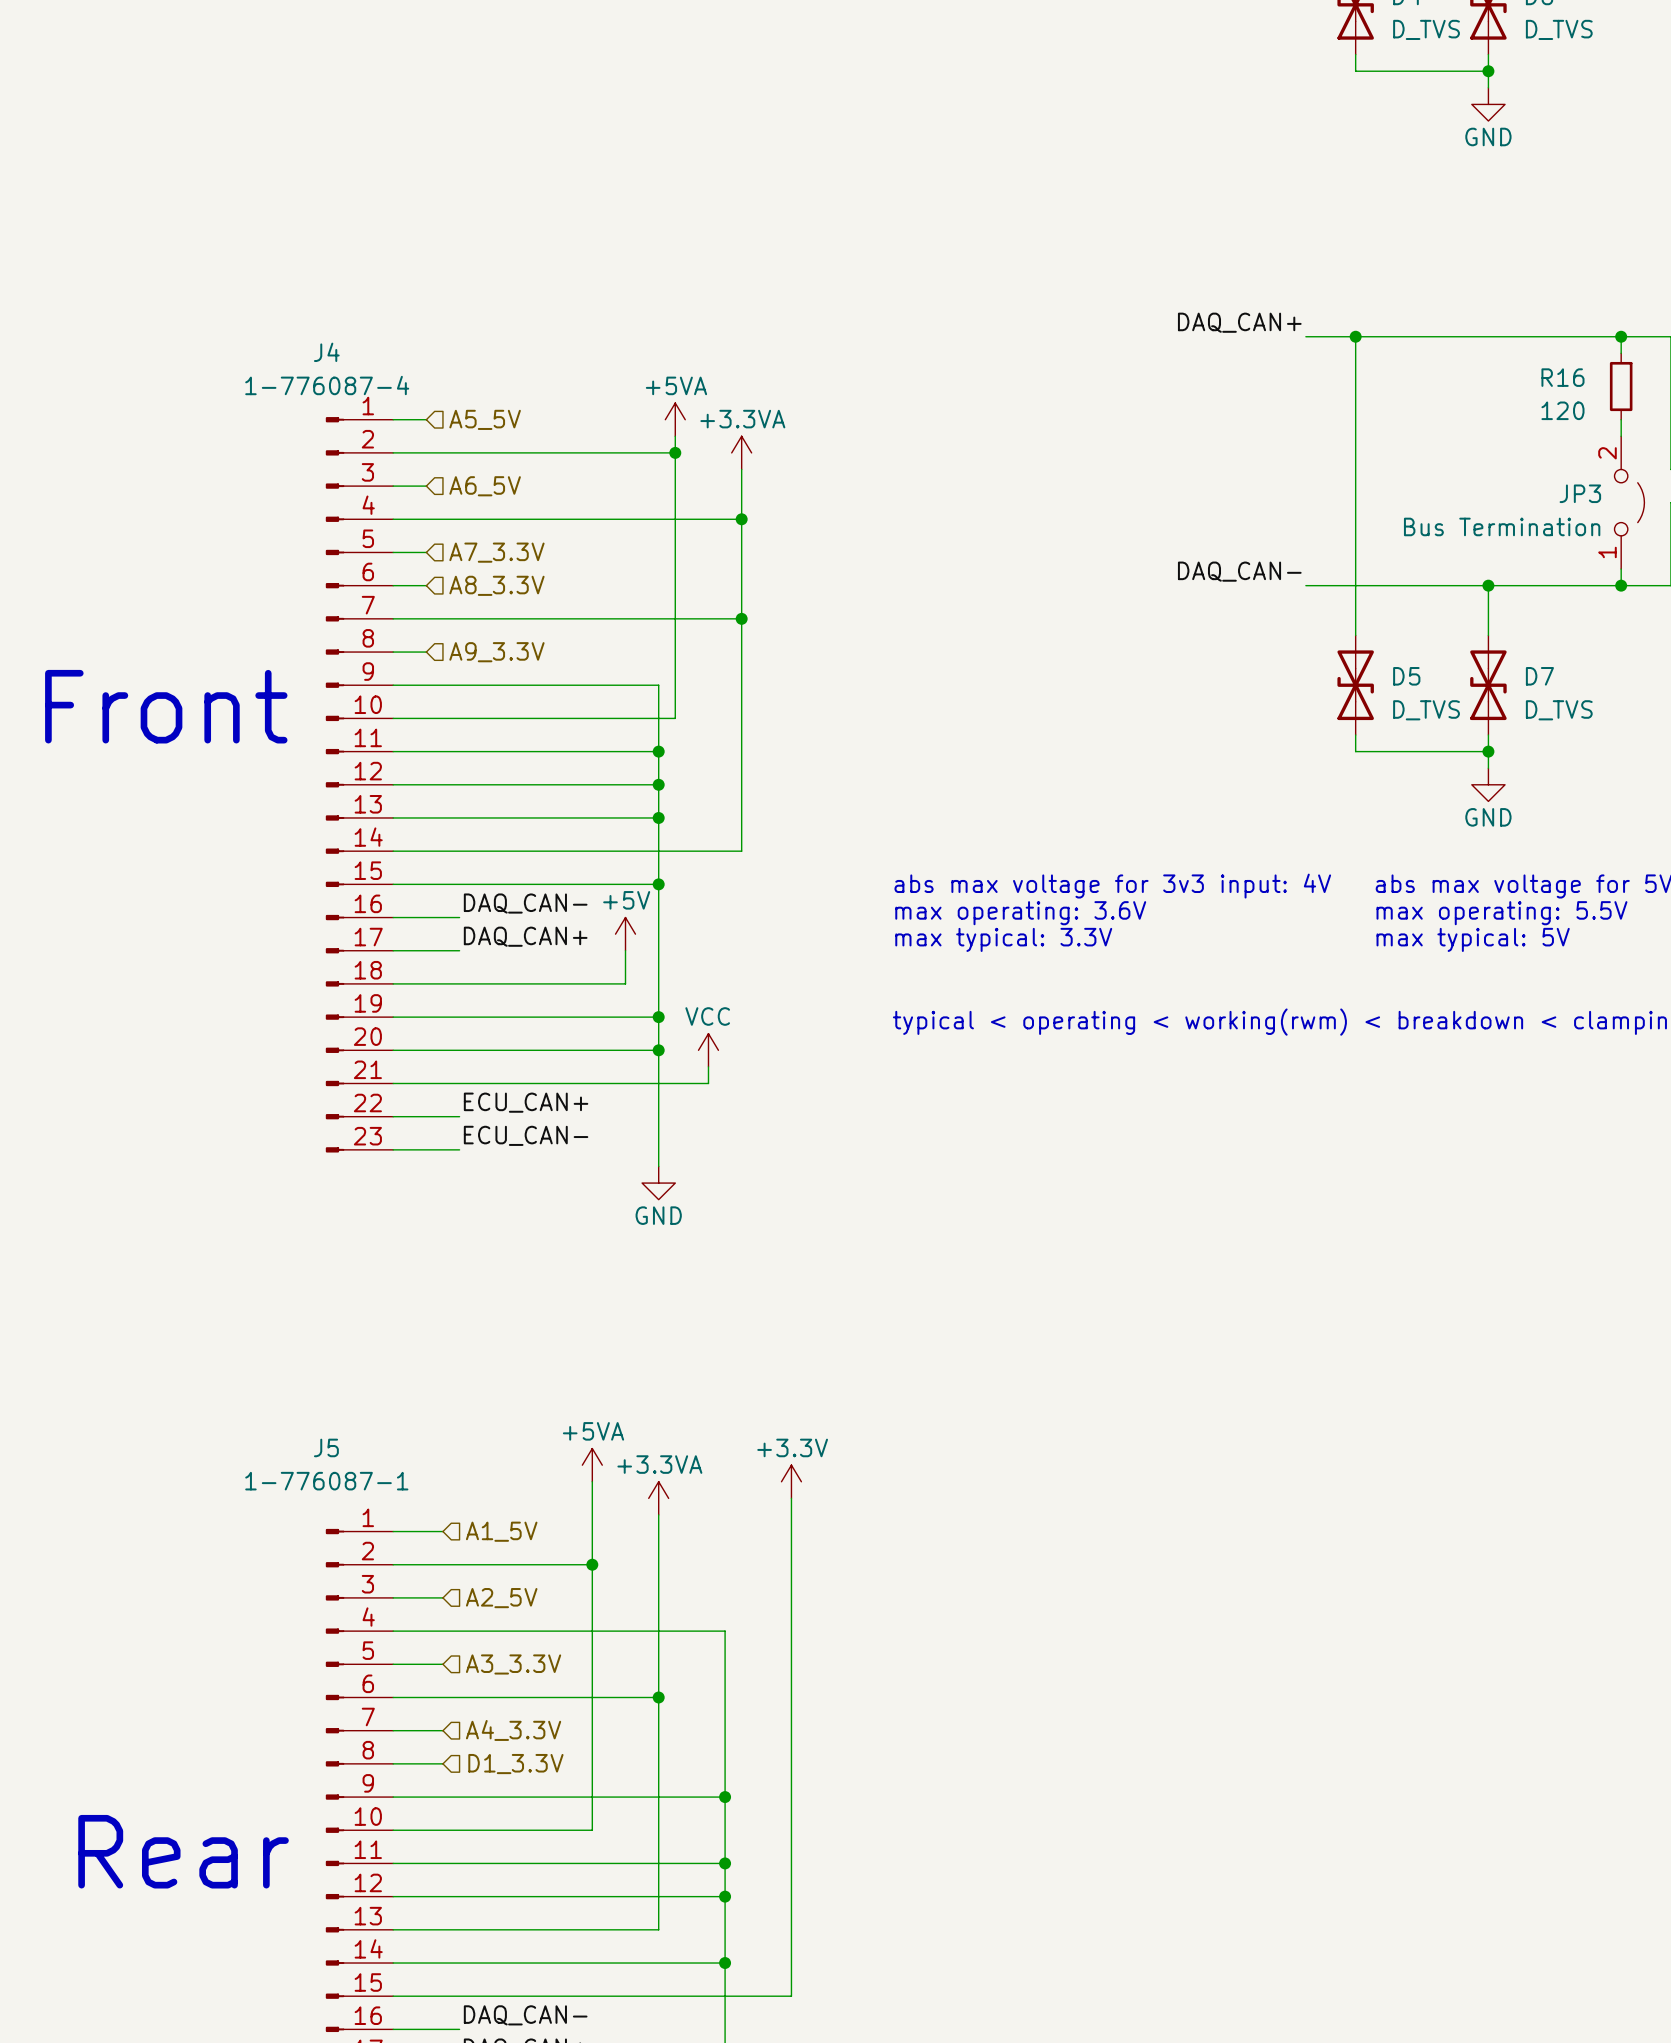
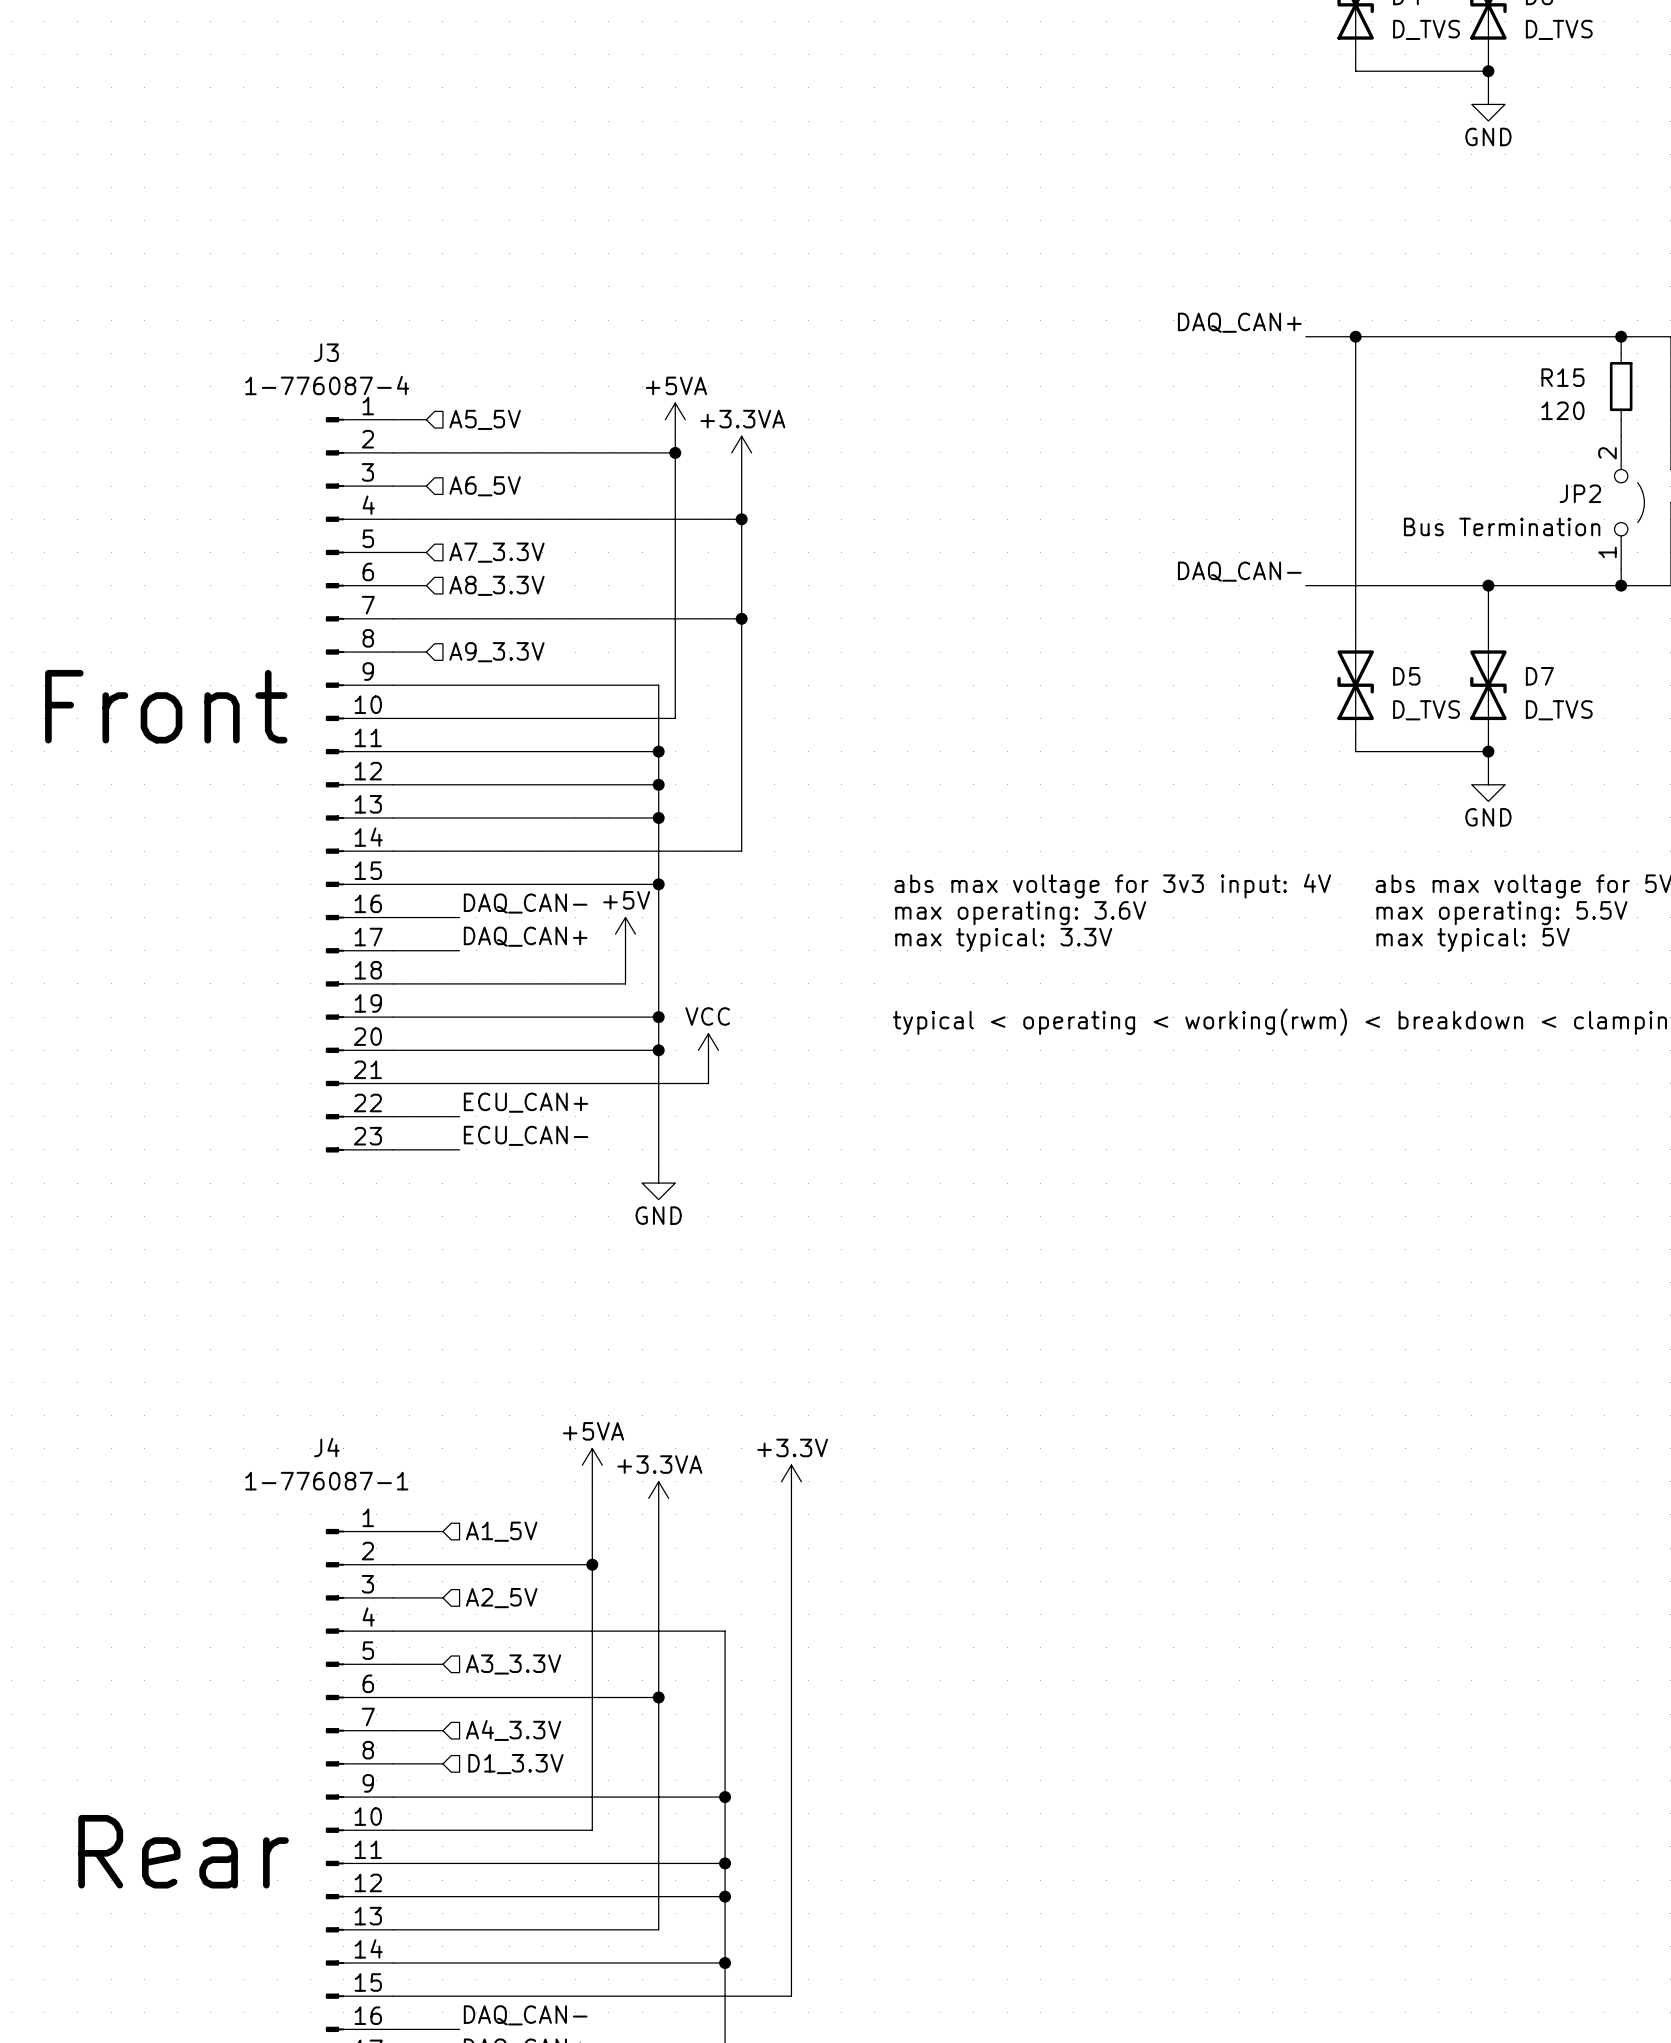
J4 name: J4 (326, 352) -> J3 (326, 352)
R16 name: R16 (1562, 377) -> R15 (1562, 377)
JP3 name: JP3 (1580, 493) -> JP2 (1580, 493)
J5 name: J5 (326, 1447) -> J4 (326, 1447)

